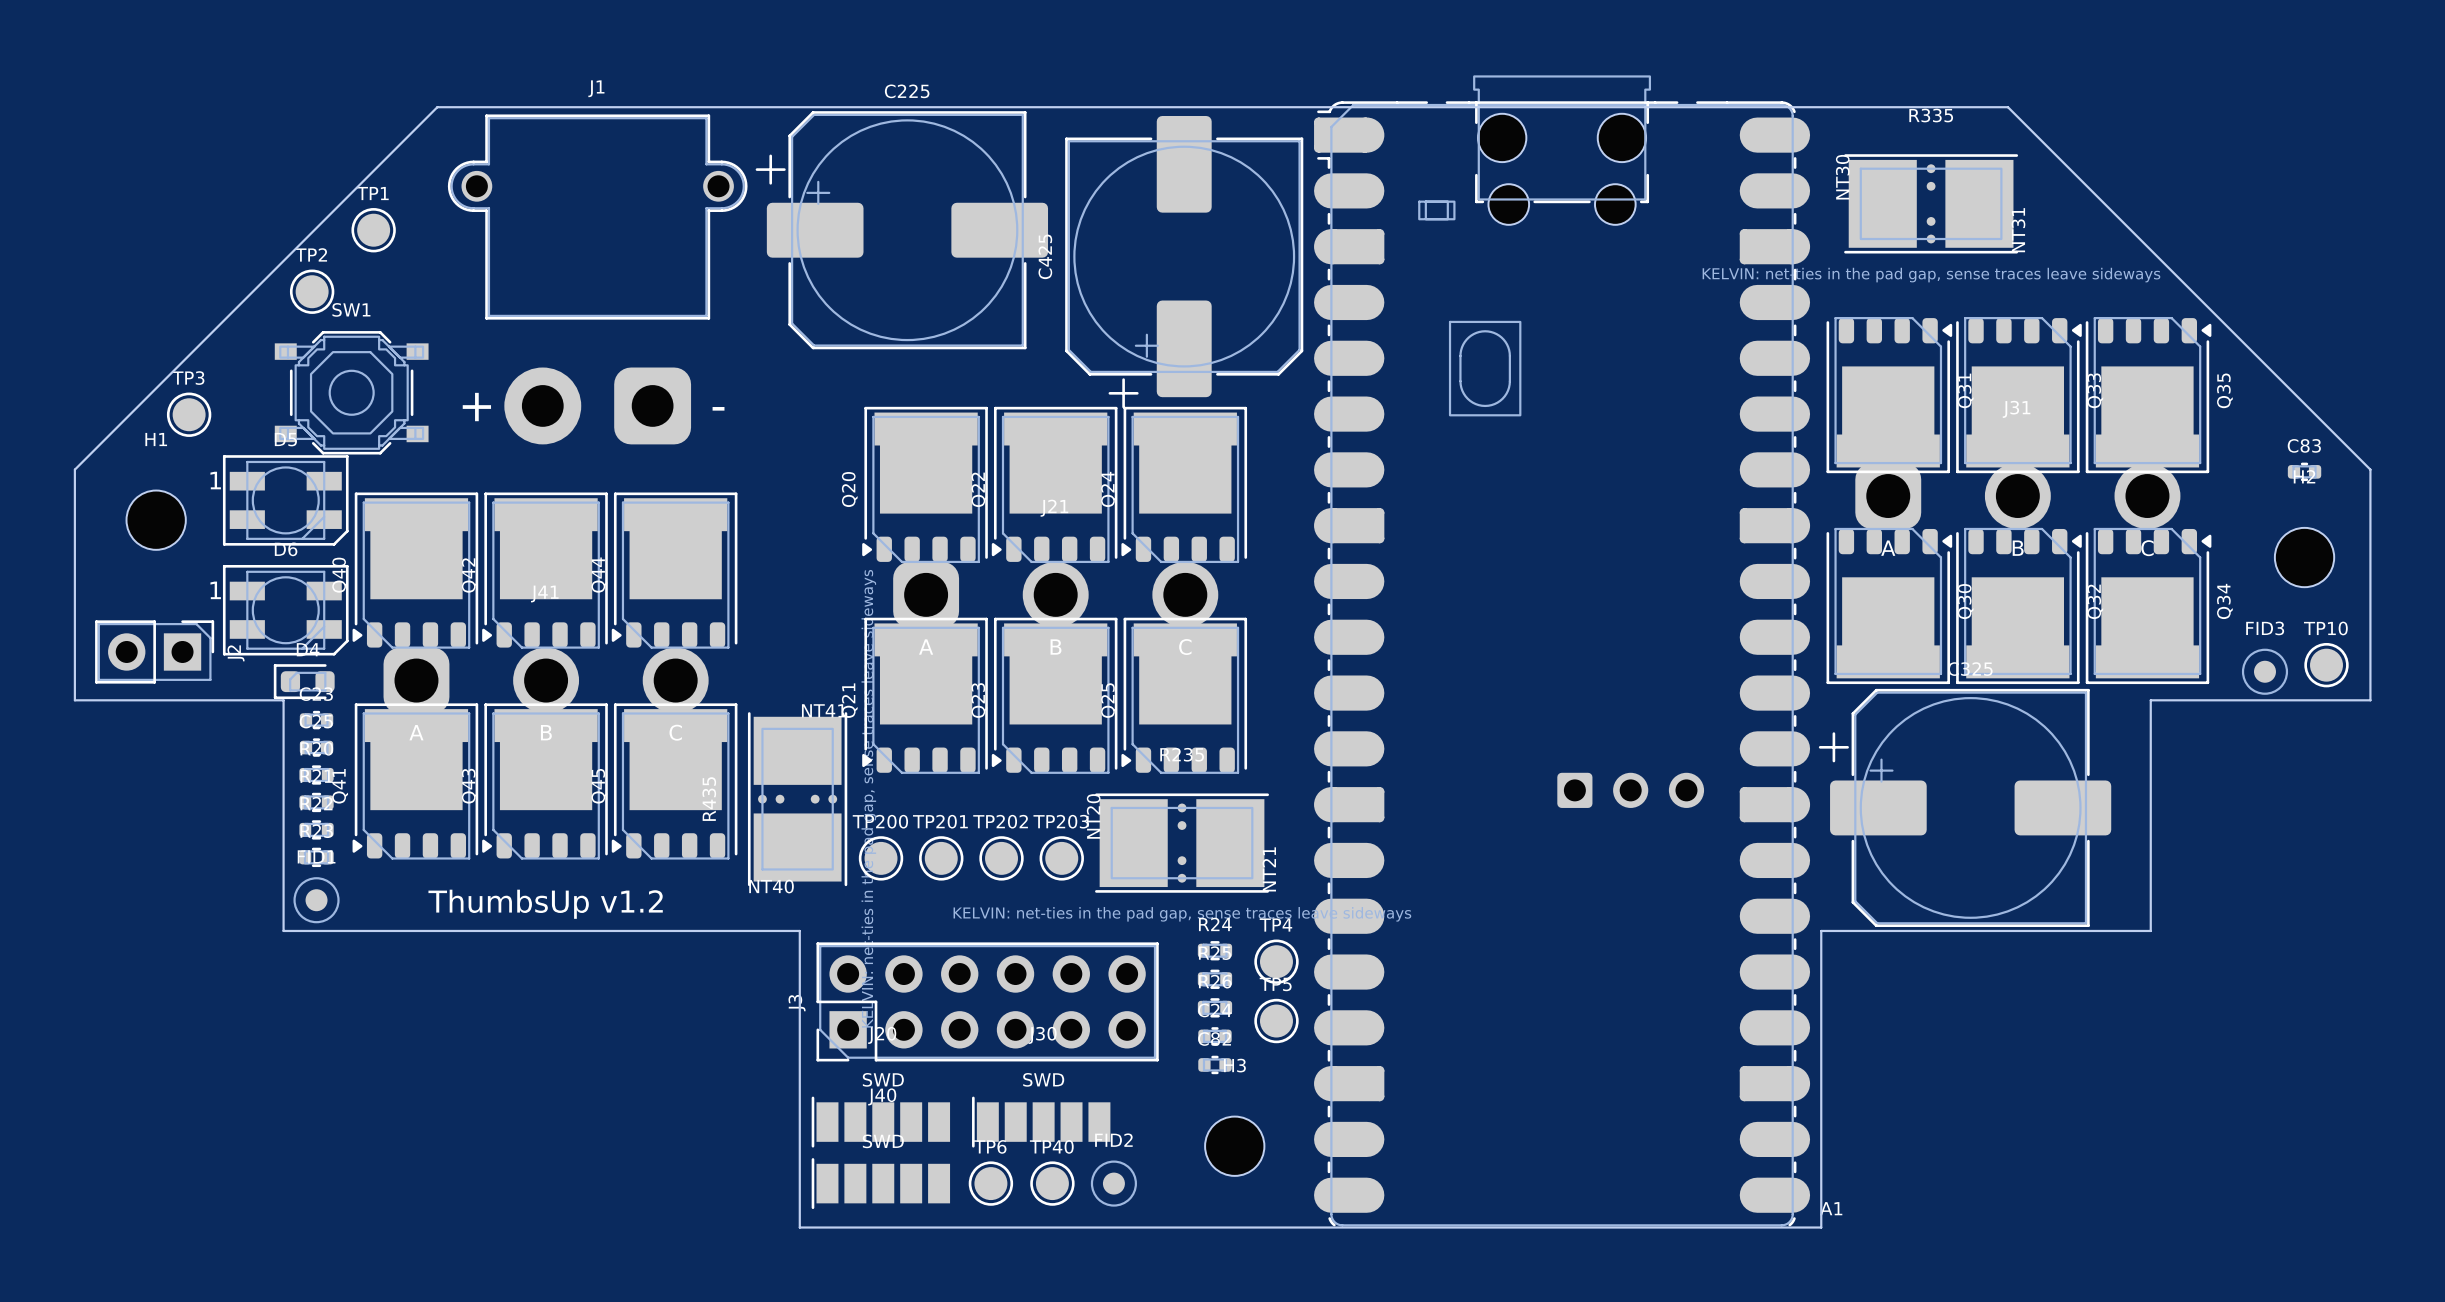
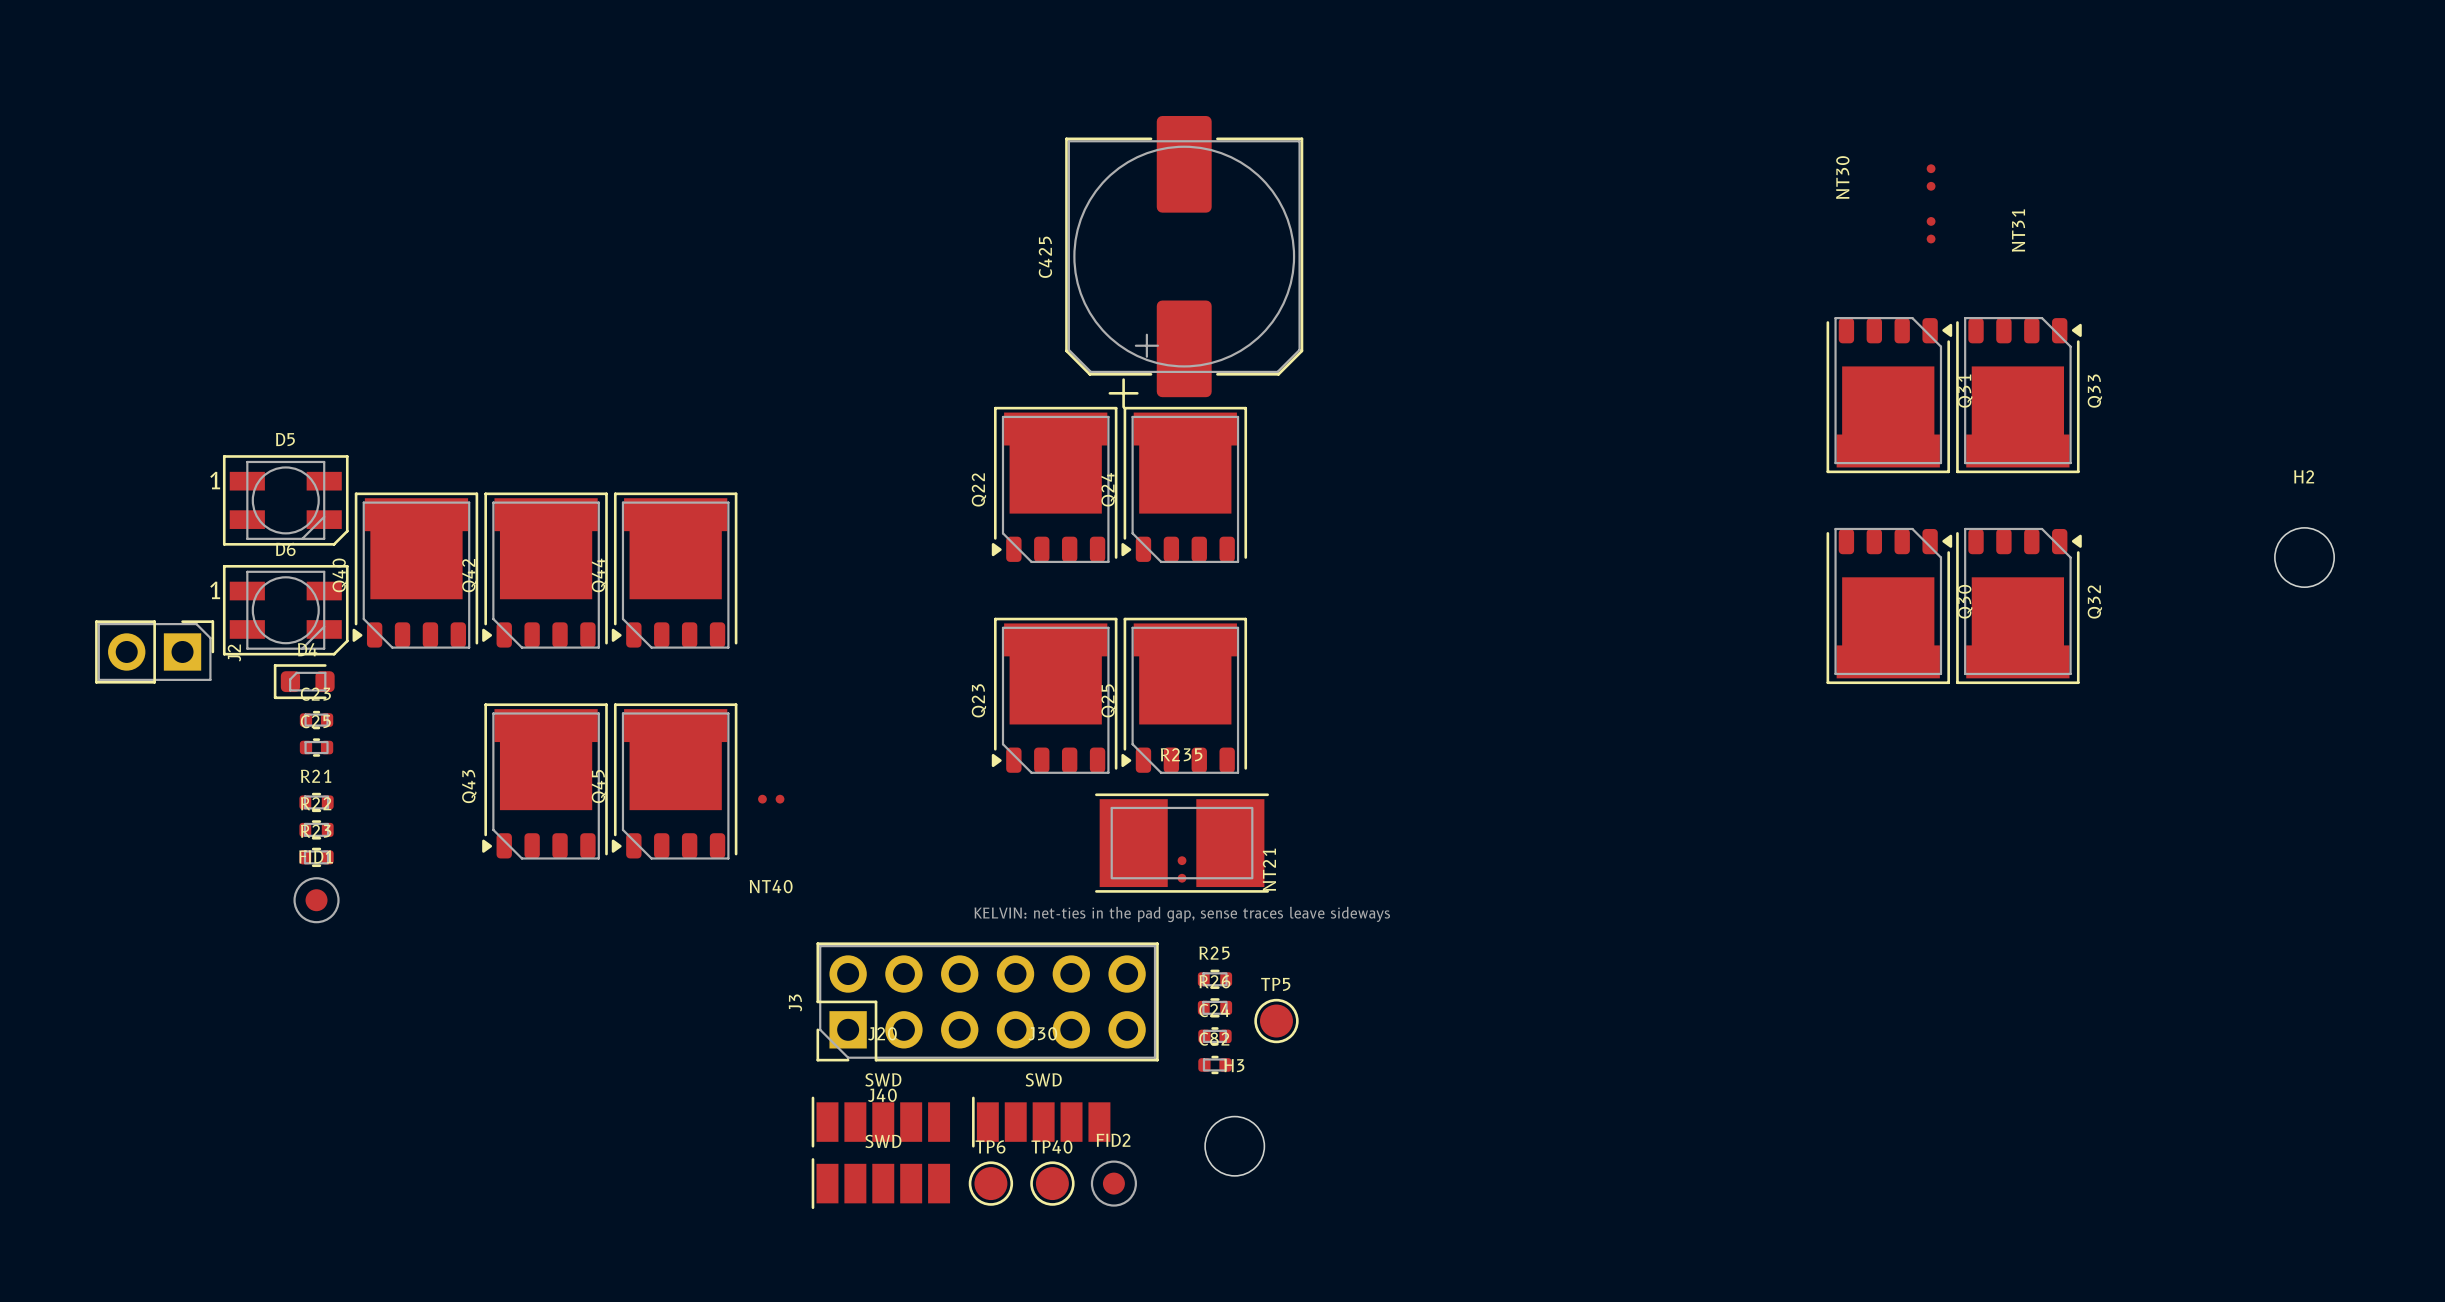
board edge: (437, 107) (74, 469) (74, 700) (283, 700) (283, 930) (799, 930) (799, 1227) (1821, 1227) (1821, 930) (2150, 930) (2150, 700) (2370, 700) (2370, 469) (2007, 107) (437, 107) -> none
R335: (1931, 203) -> none
TP1: (373, 230) -> none
C225: (901, 230) -> none
J1: (597, 279) -> none
TP2: (312, 291) -> none
SW1: (351, 392) -> none
Q35: (2148, 395) -> none
TP3: (189, 414) -> none
C83: (2304, 471) -> none
Q20: (925, 484) -> none
part: (2017, 496) -> none
H1: (156, 520) -> none
part: (1055, 594) -> none
Q34: (2148, 605) -> none
A1: (1562, 650) -> none
TP10: (2326, 665) -> none
FID3: (2264, 671) -> none
part: (546, 680) -> none
Q21: (925, 695) -> none
part: (316, 775) -> none
Q41: (415, 781) -> none
part: (797, 799) -> none
NT41: (823, 799) -> none
part: (1965, 807) -> none
NT20: (1182, 816) -> none
TP200: (881, 858) -> none
TP201: (941, 858) -> none
TP202: (1001, 858) -> none
TP203: (1061, 858) -> none
text: ThumbsUp v1.2 (545, 904) -> none
R24: (1214, 950) -> none
TP4: (1276, 961) -> none

